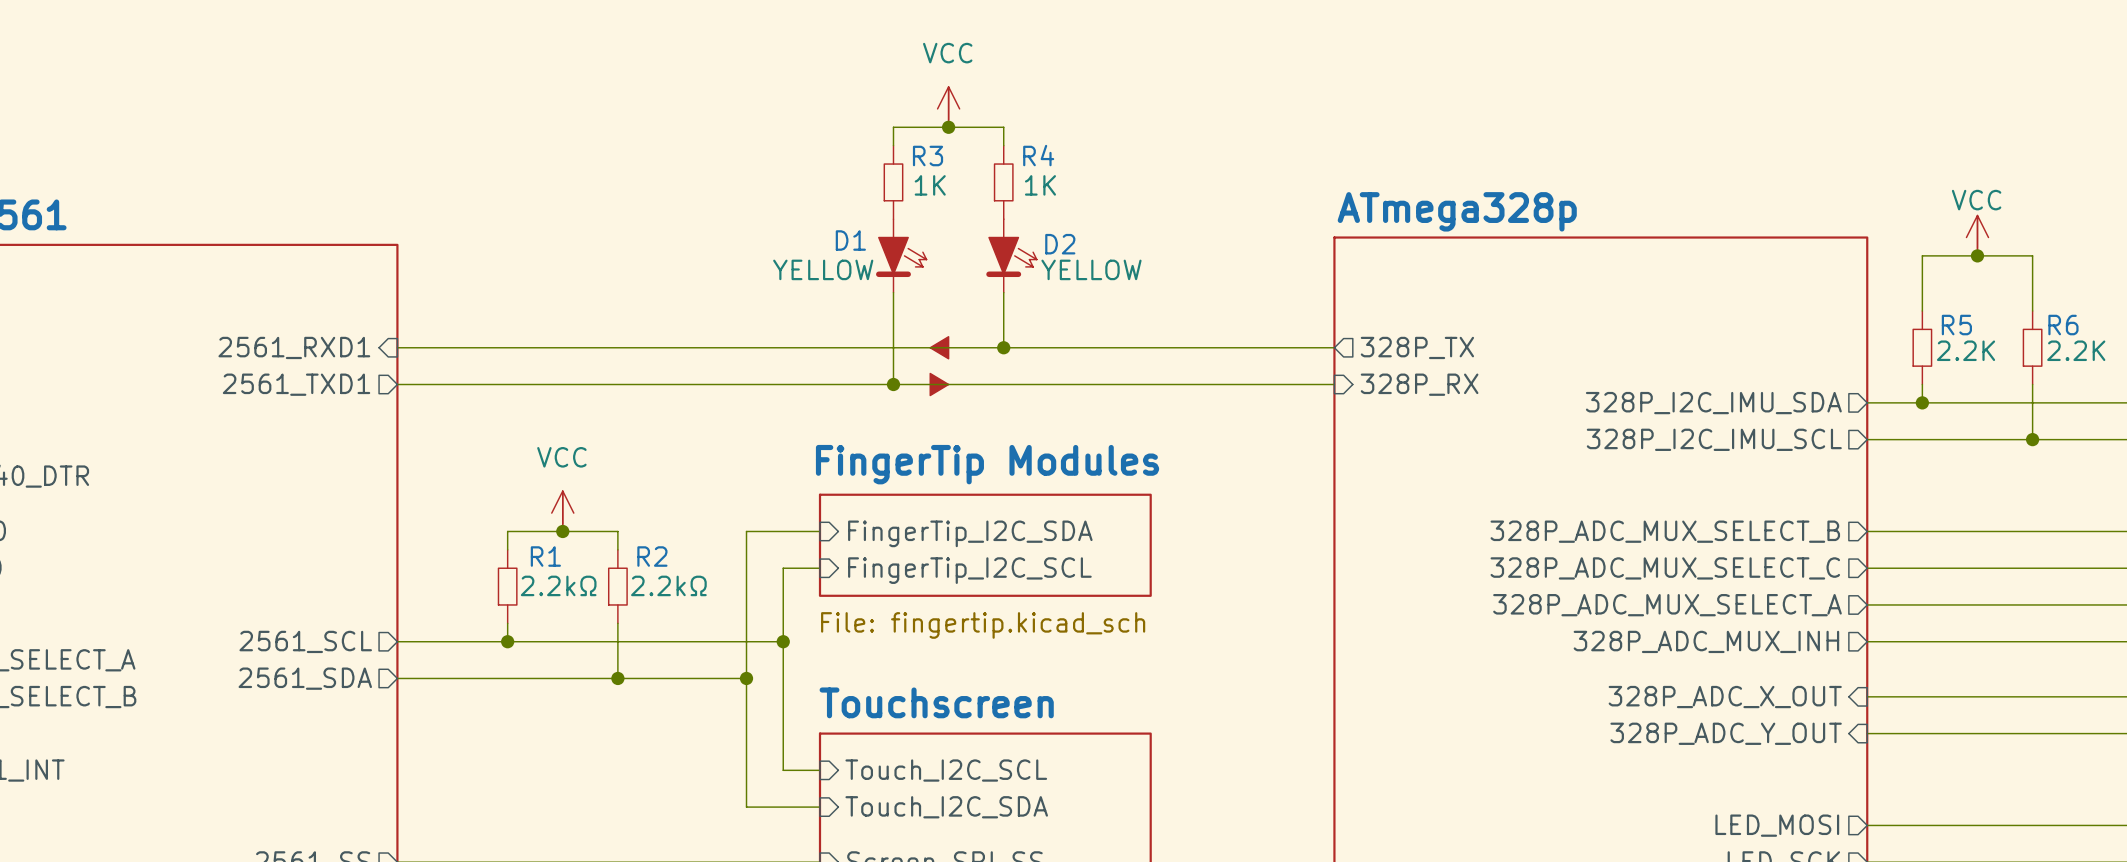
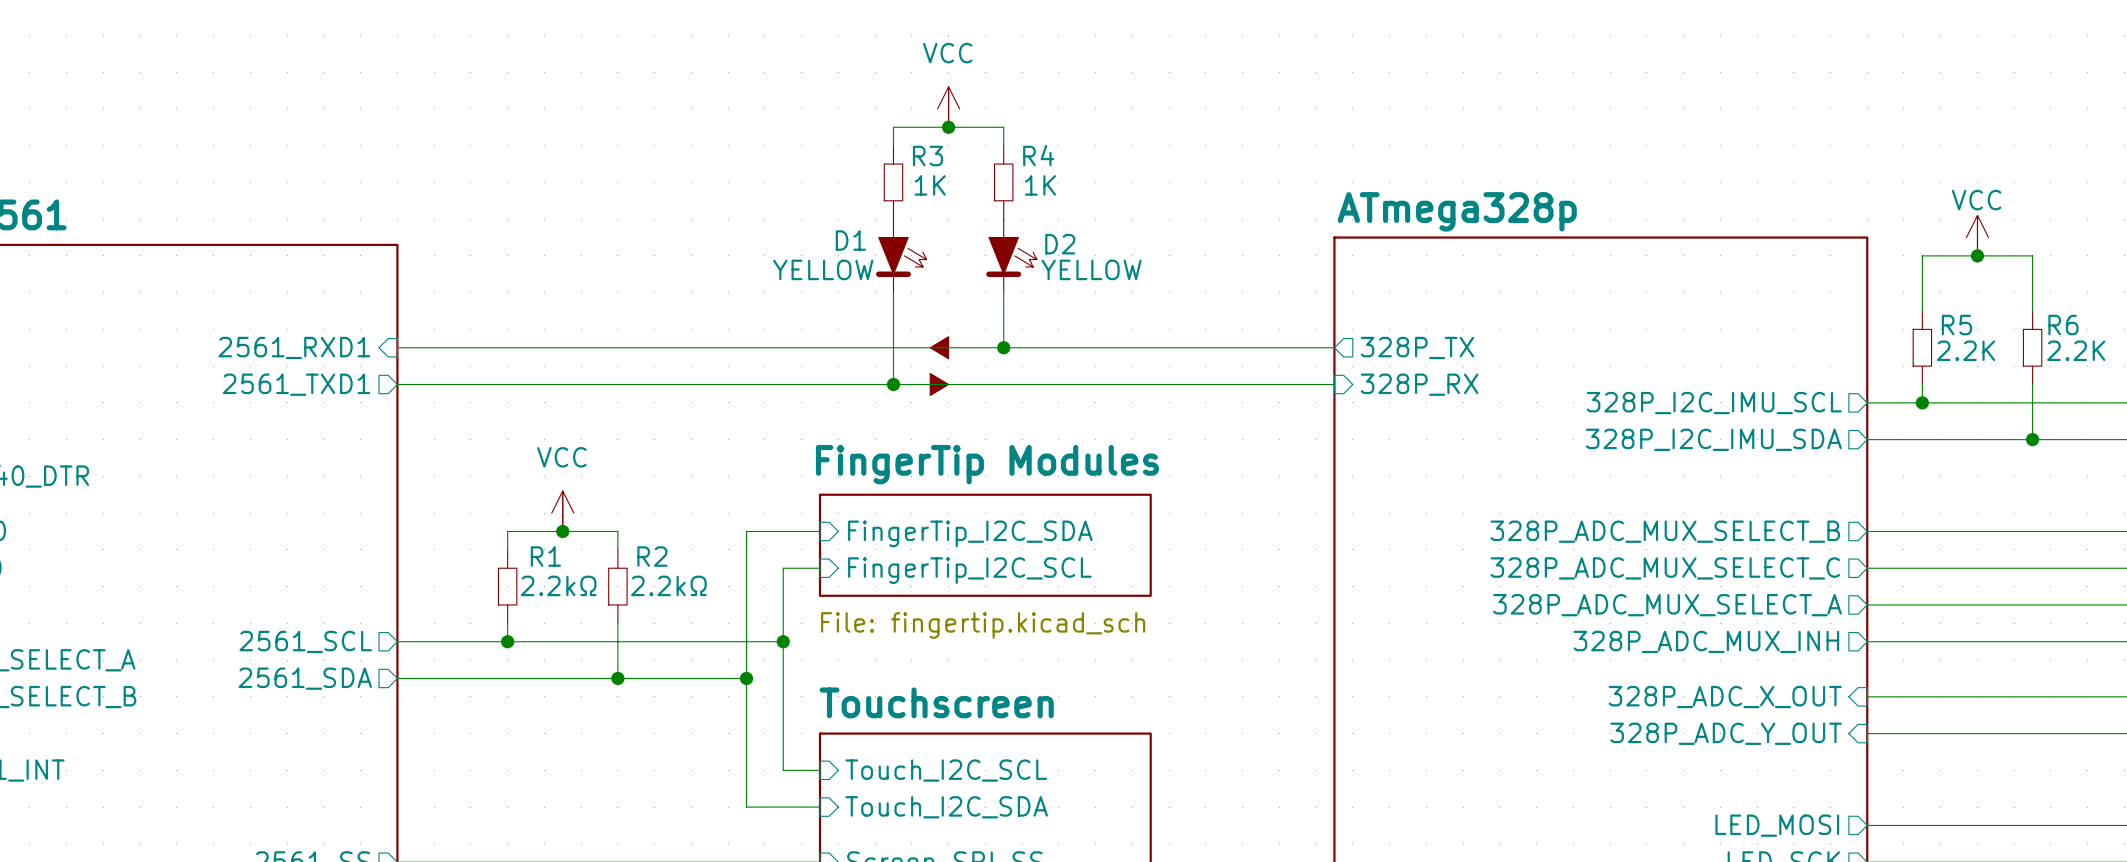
sheet pin: 328P_I2C_IMU_SDA (1713, 403) -> 328P_I2C_IMU_SCL (1714, 403)
sheet pin: 328P_I2C_IMU_SCL (1714, 439) -> 328P_I2C_IMU_SDA (1713, 439)

